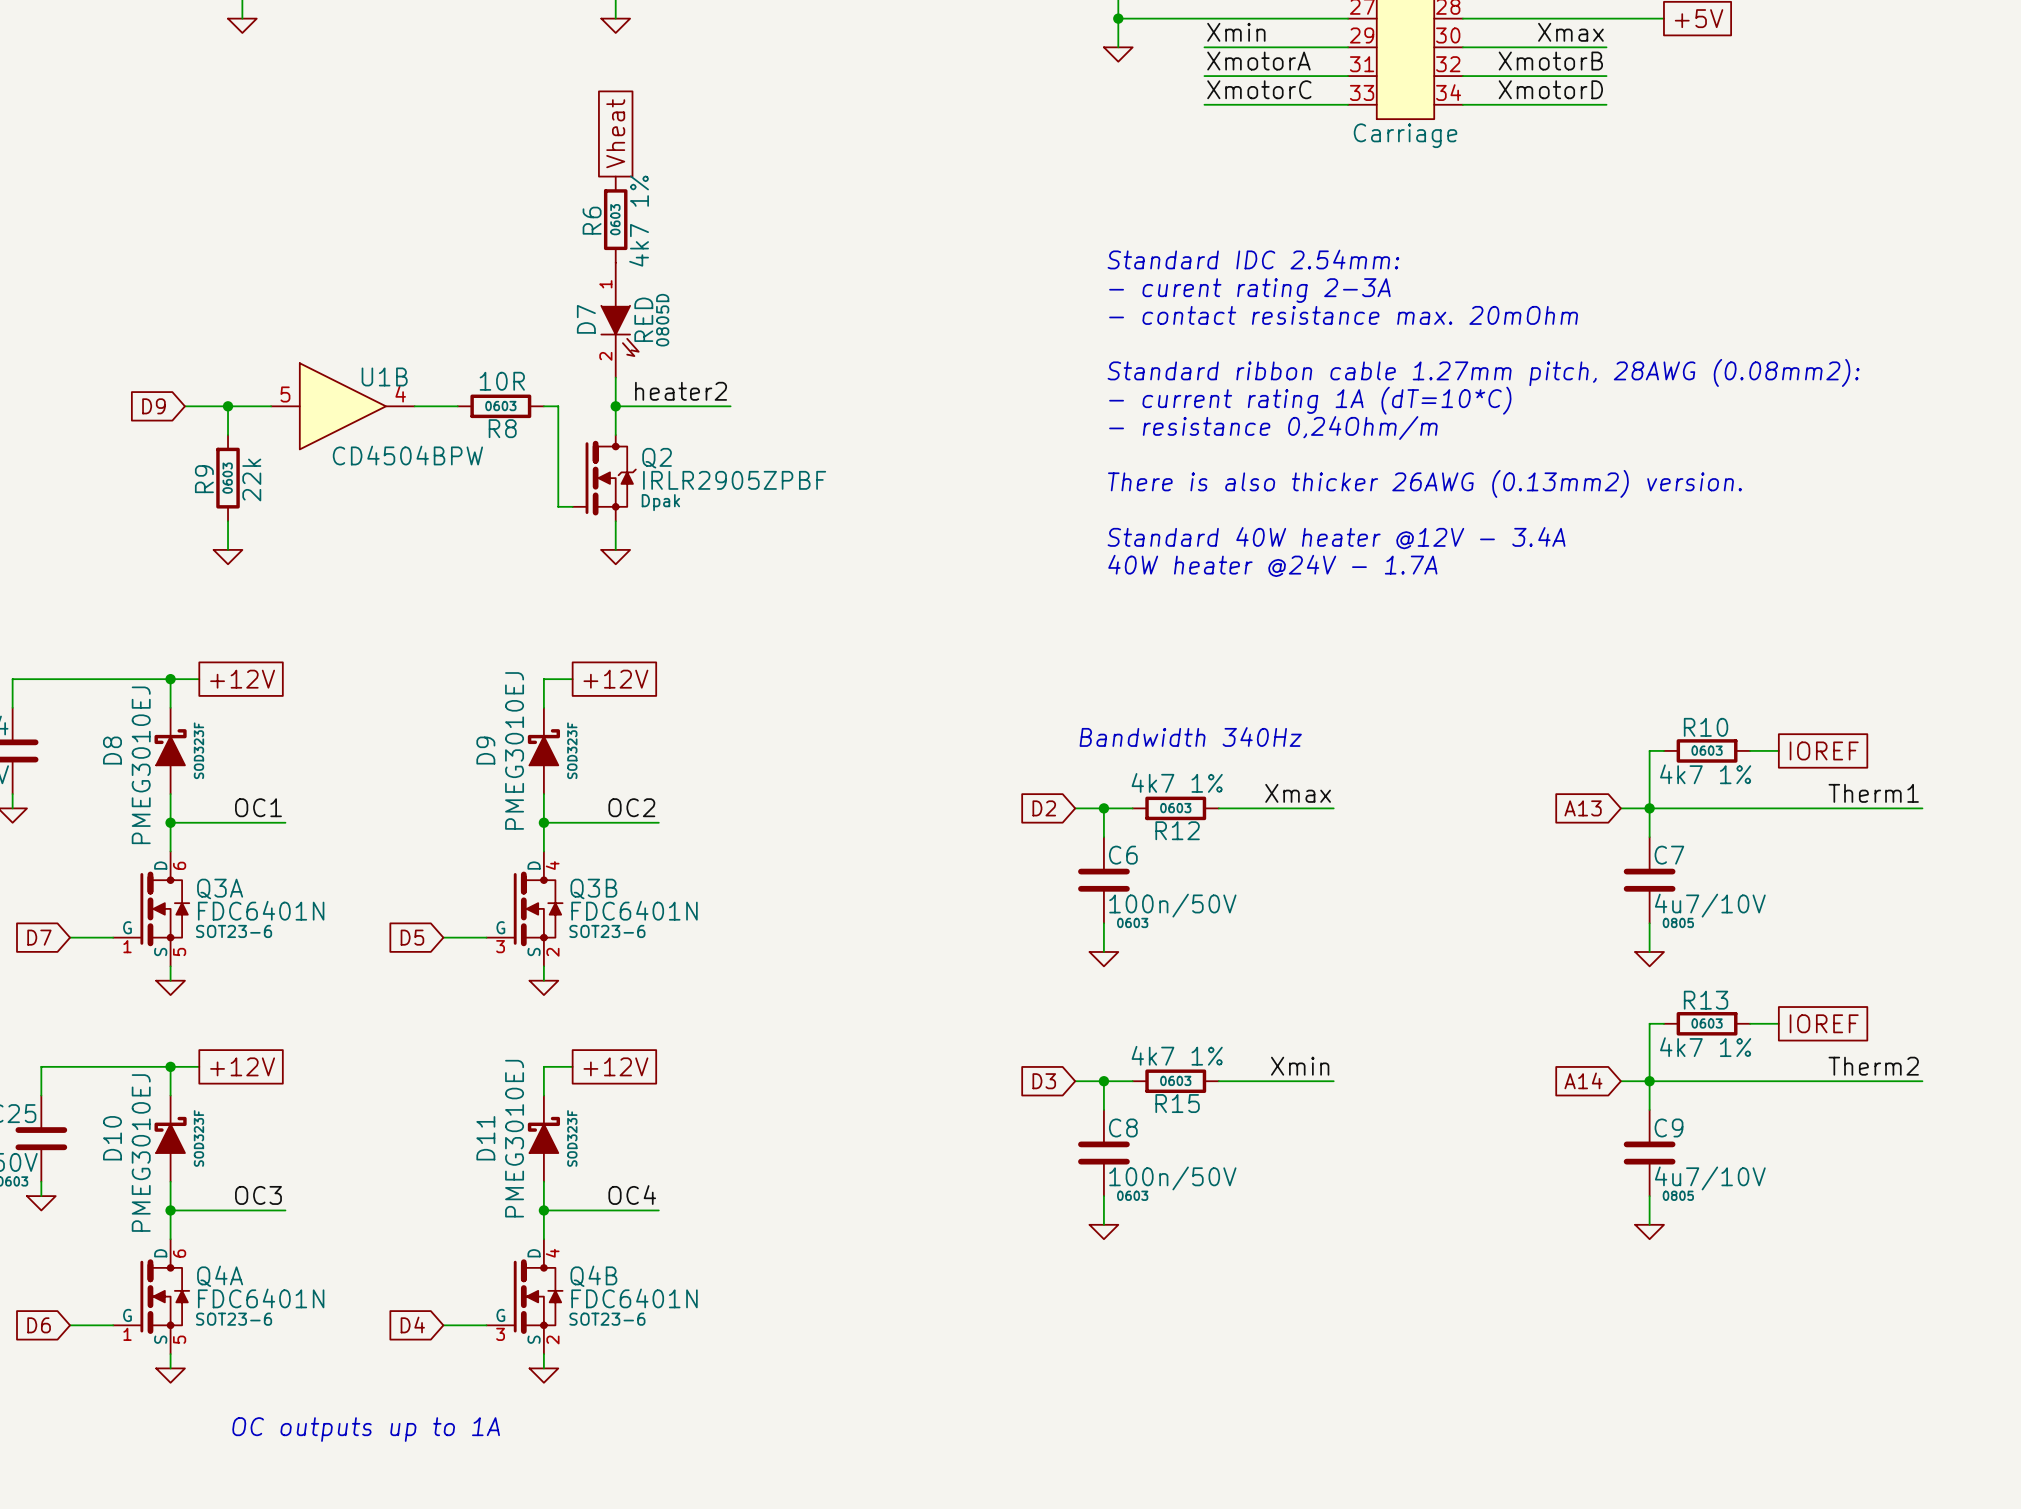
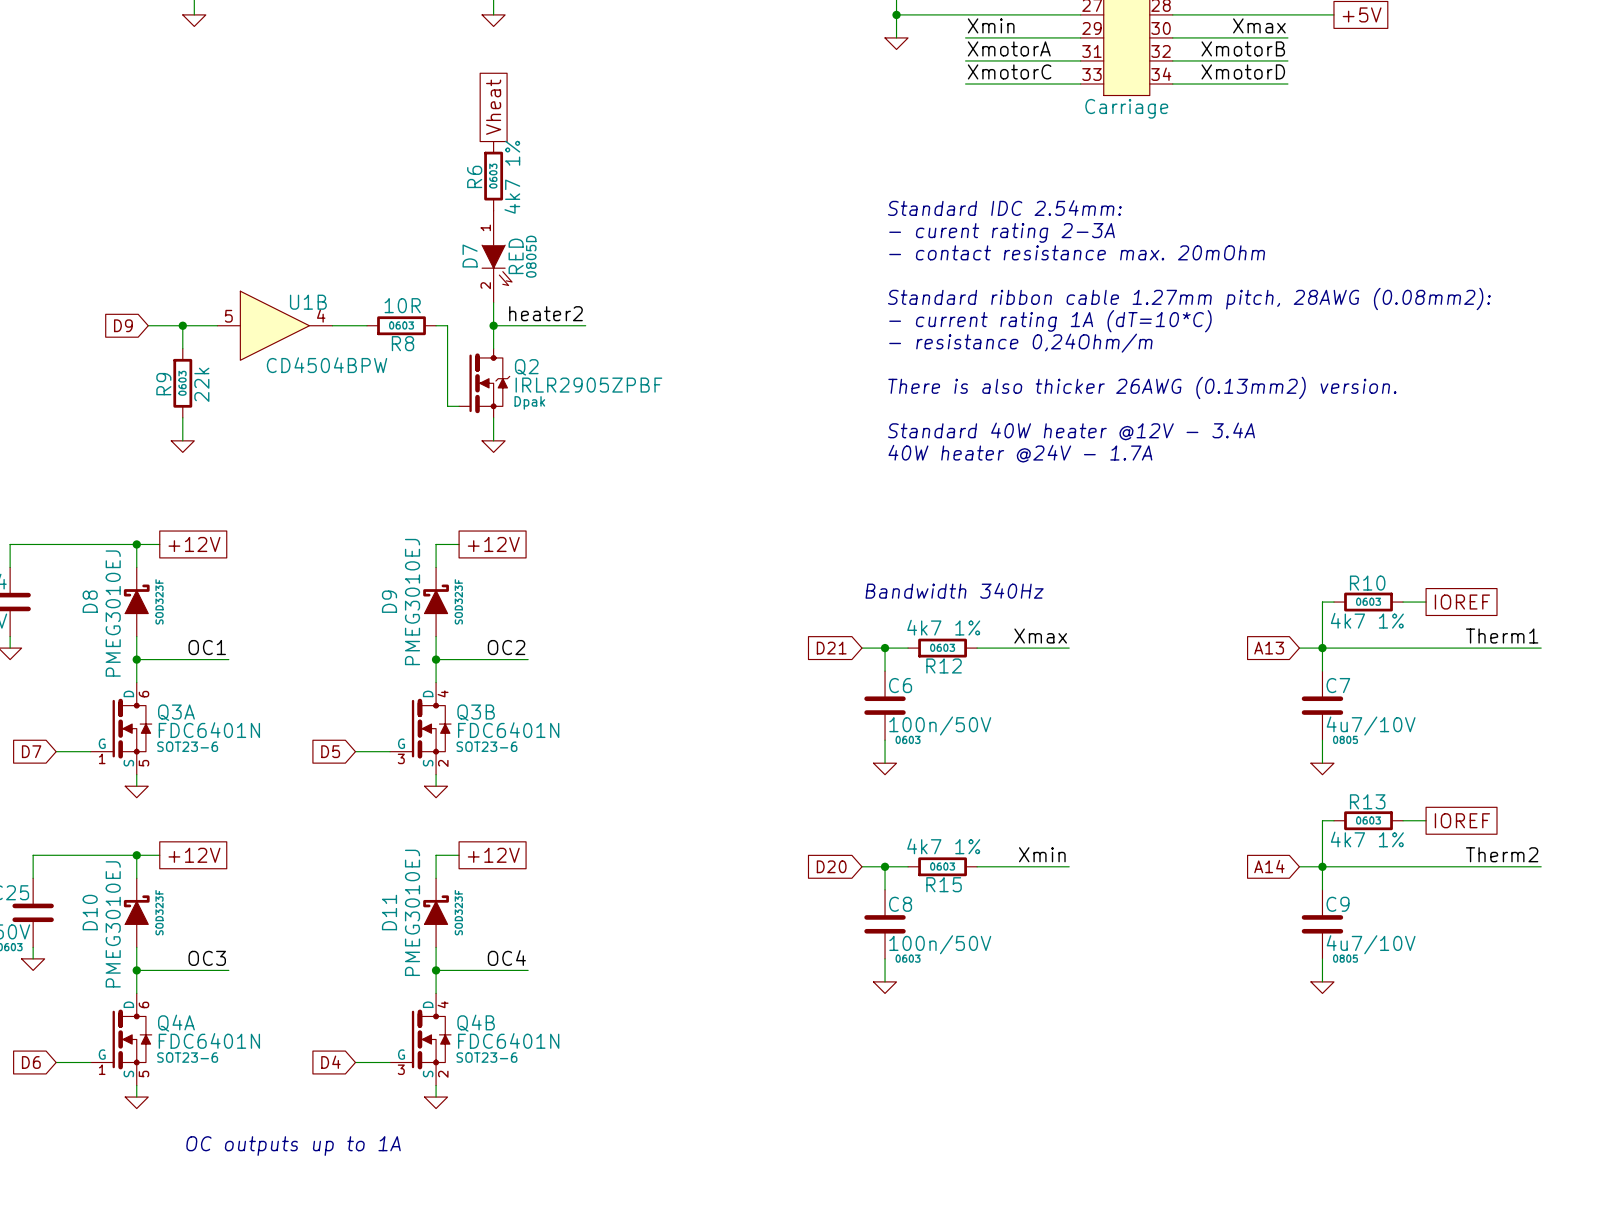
global label: D2 (1044, 808) -> D21 (831, 648)
global label: D3 (1044, 1081) -> D20 (831, 866)

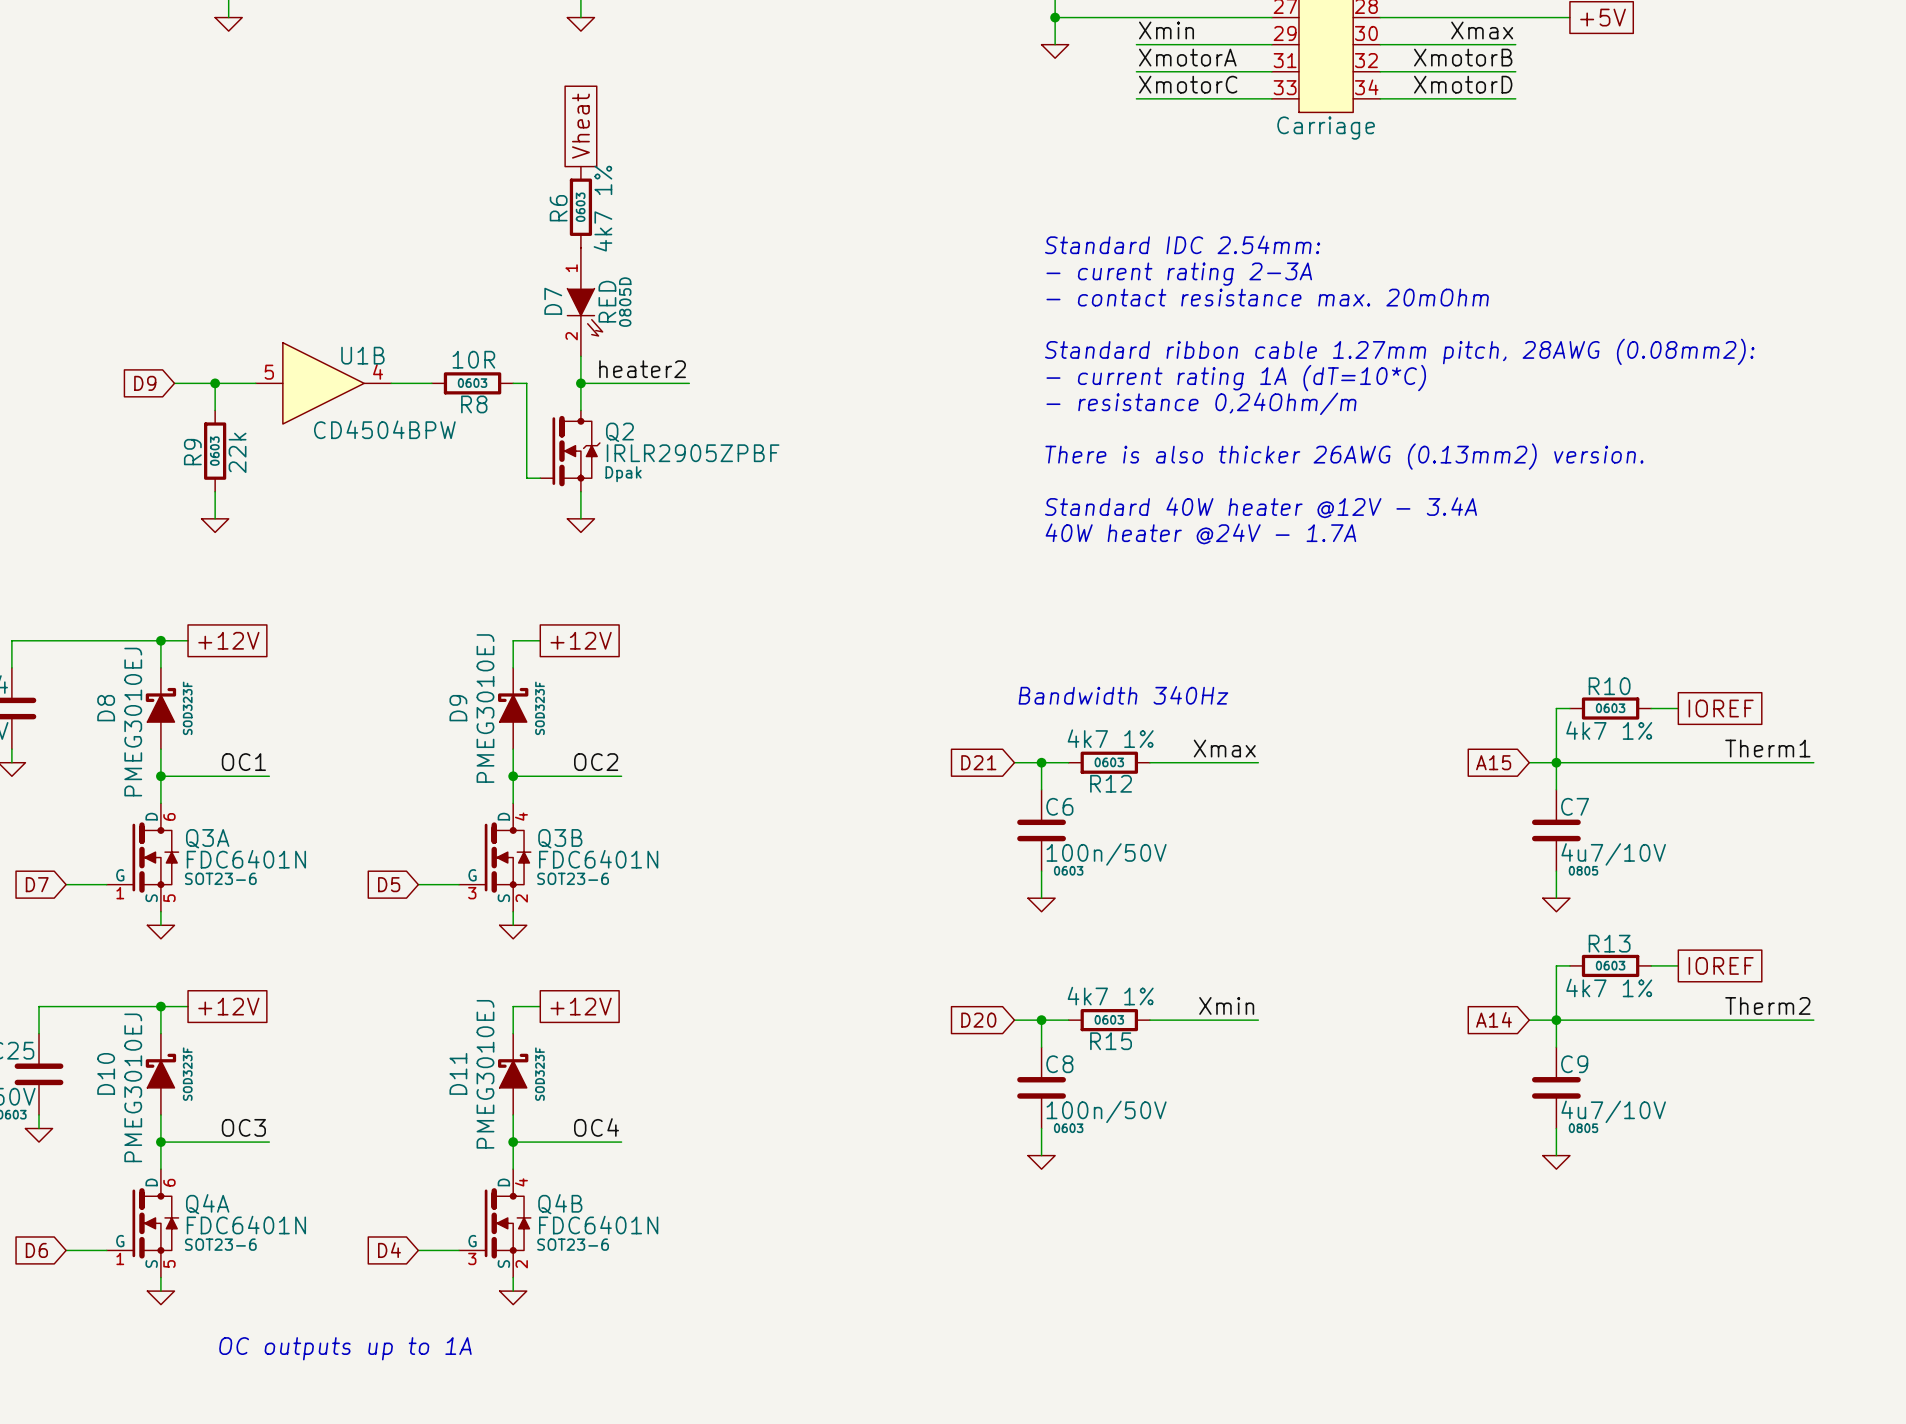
global label: A13 (1269, 648) -> A15 (1493, 762)

